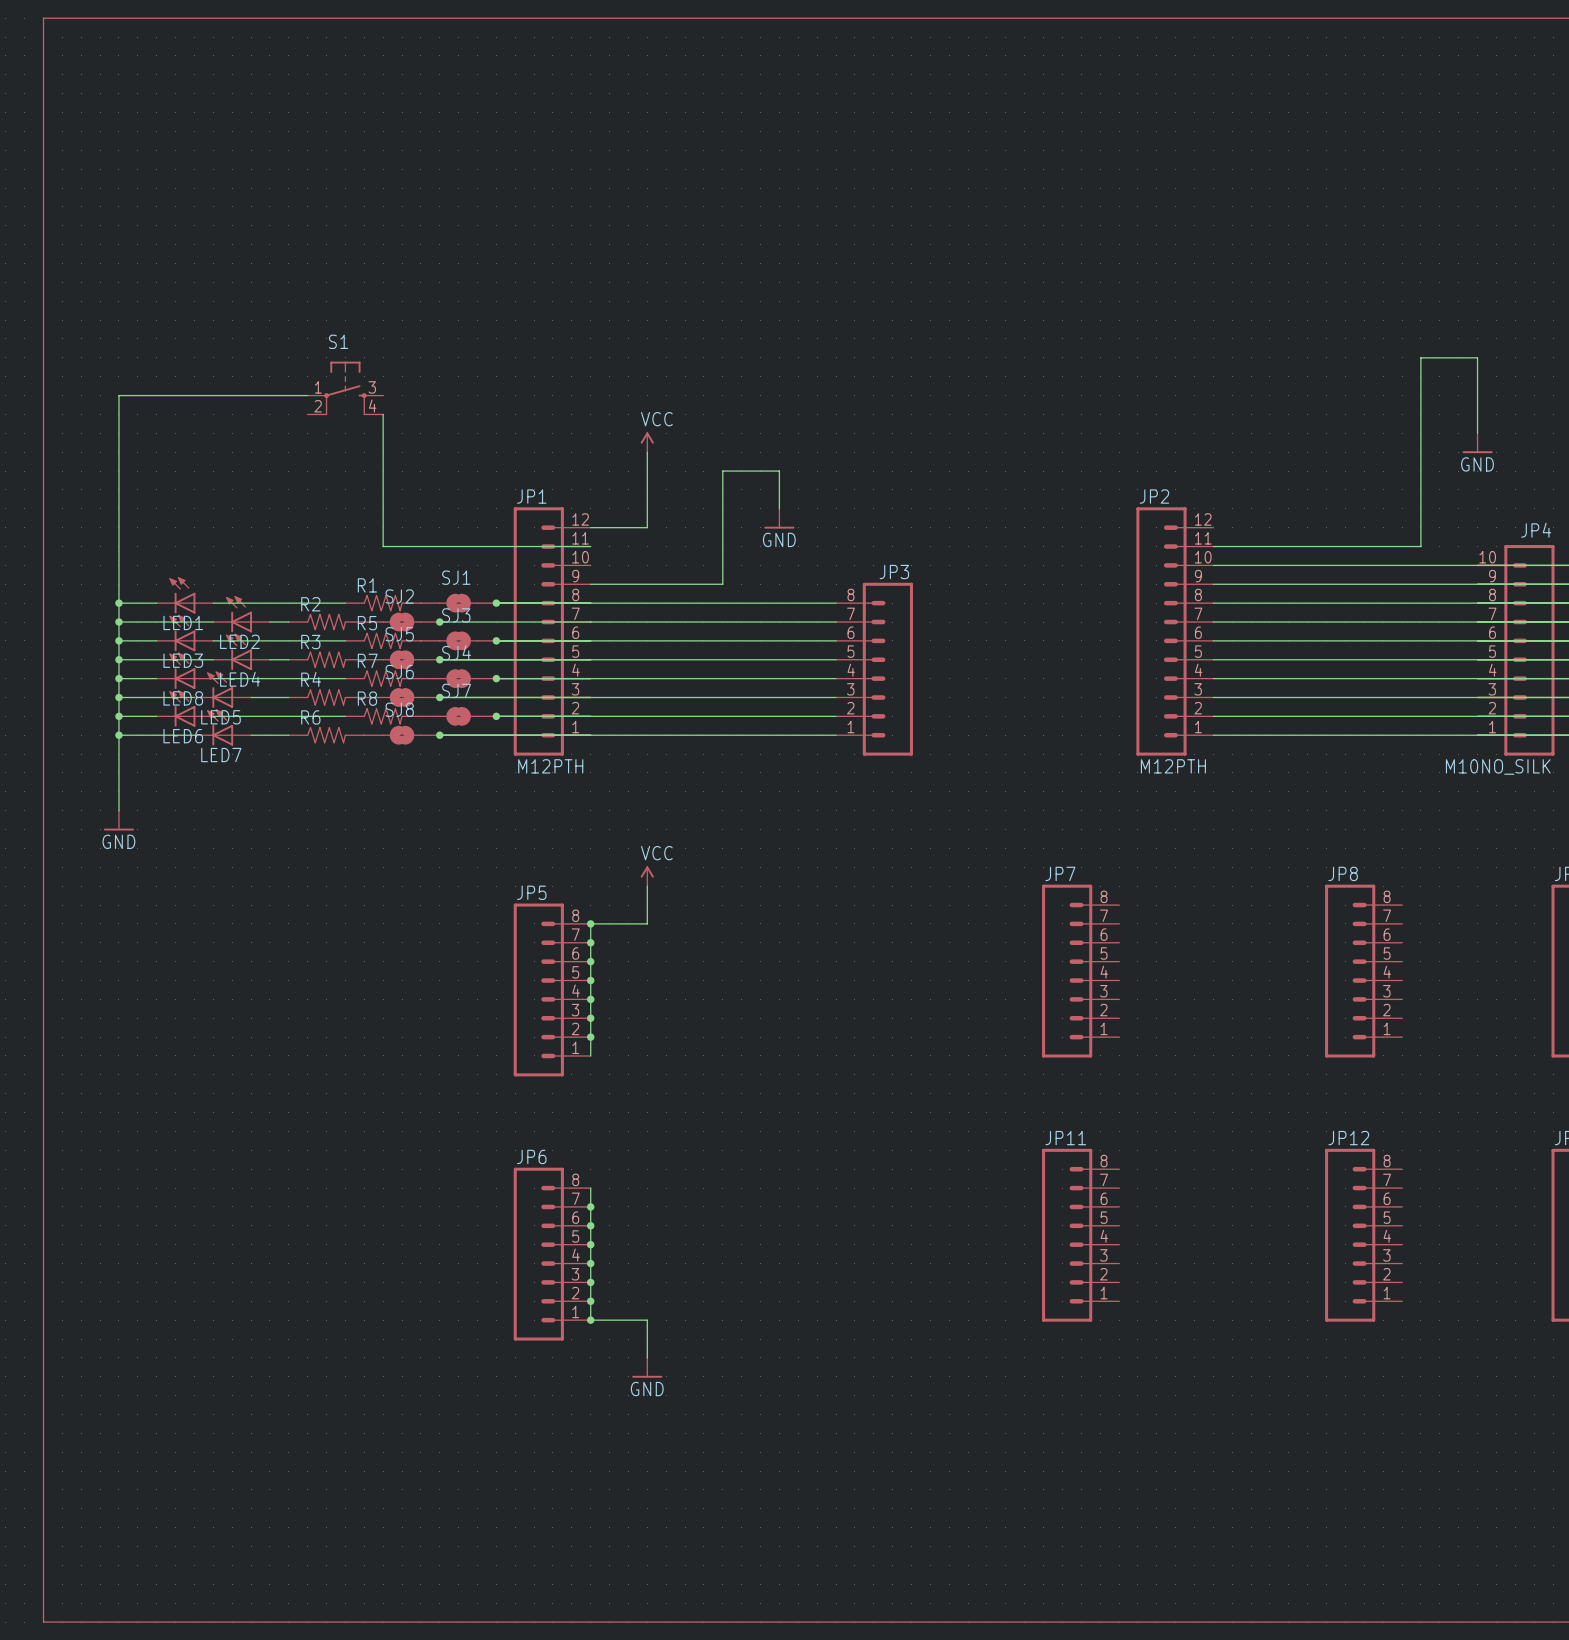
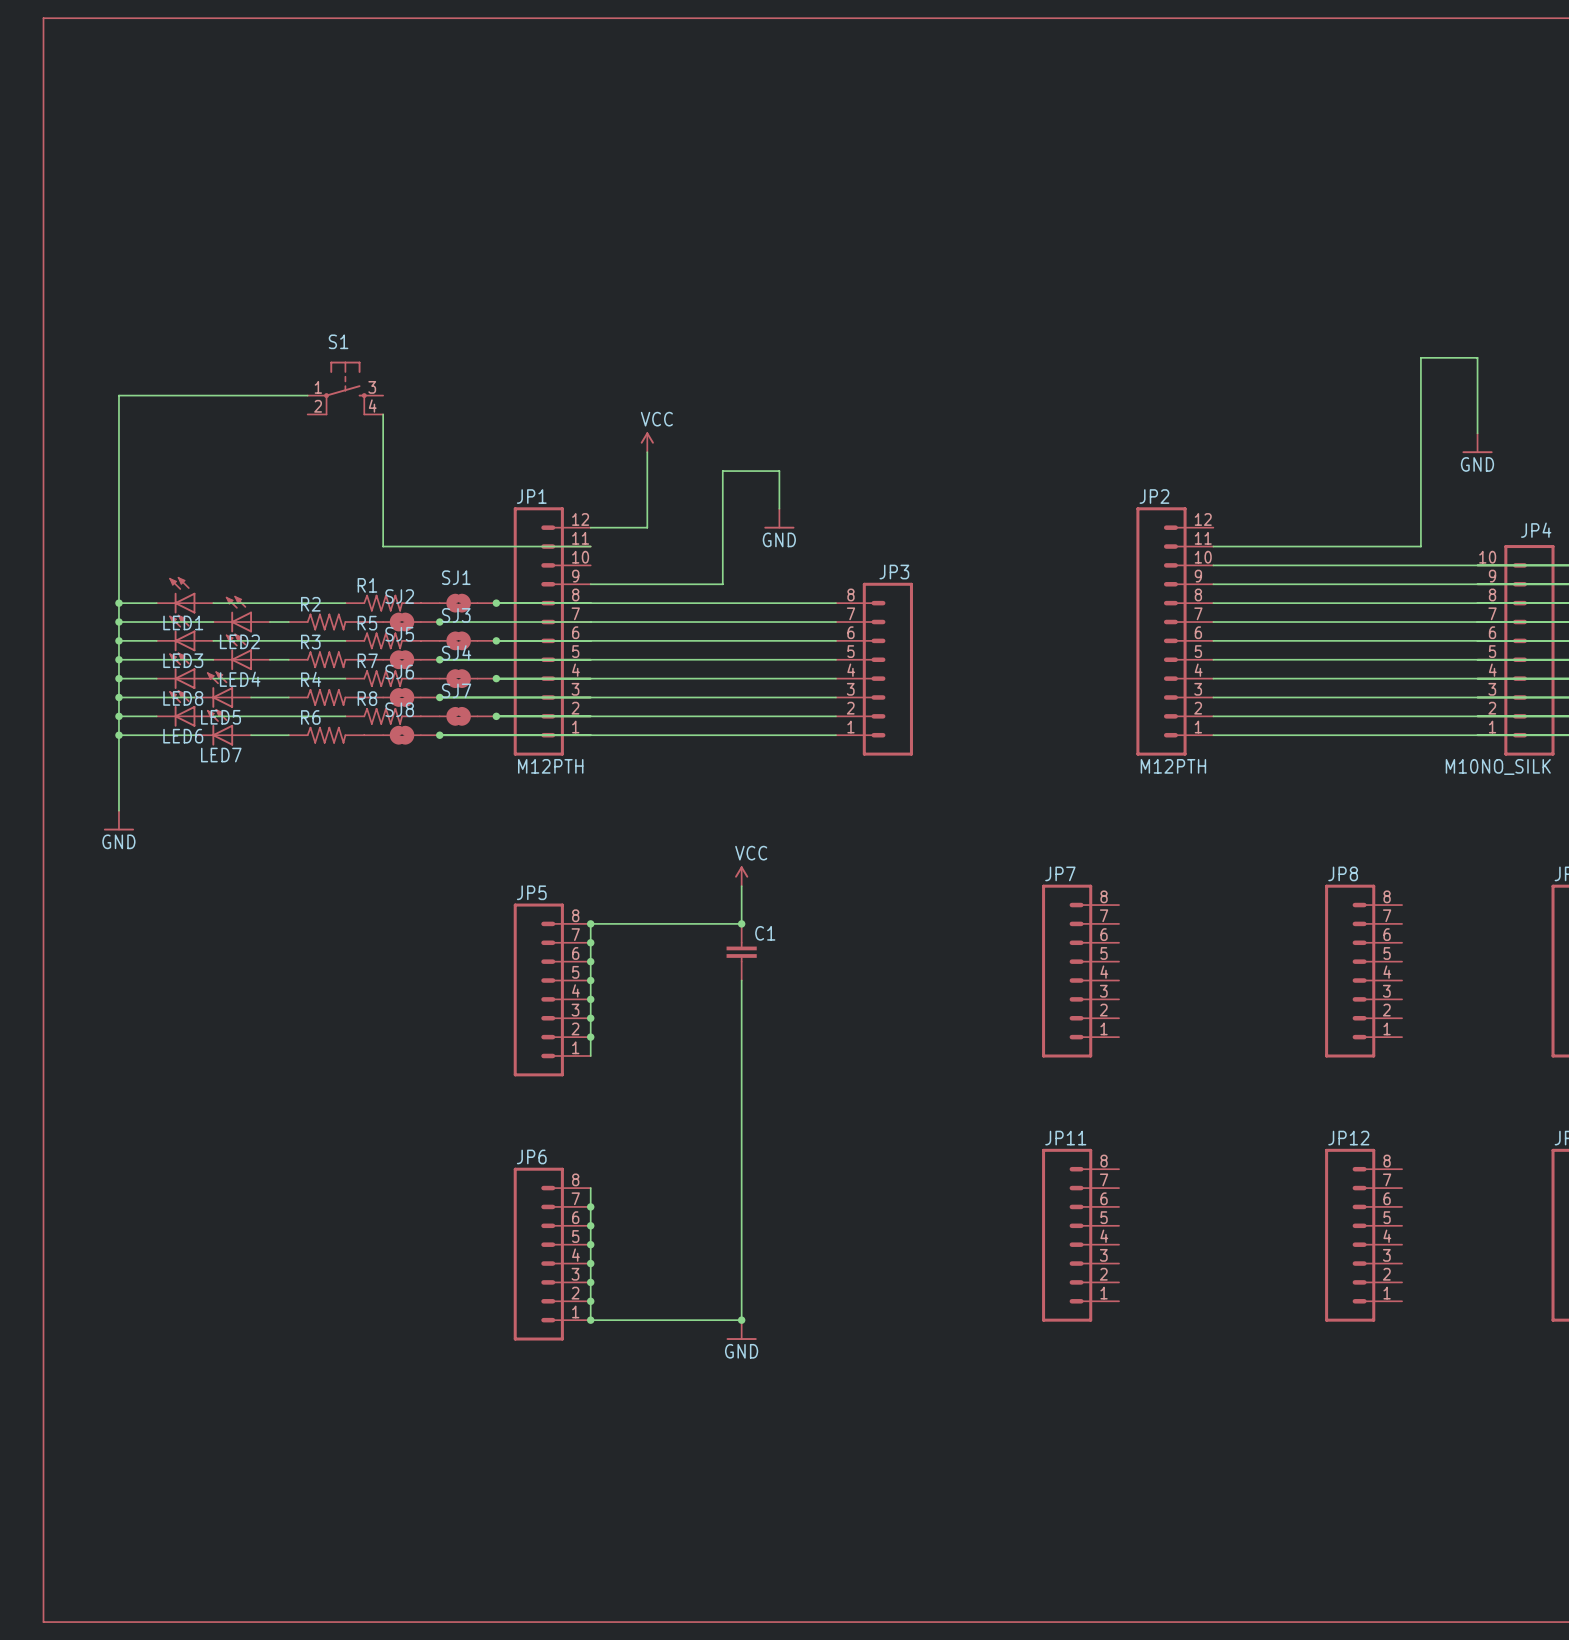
power symbol position: VCC (647, 876) -> VCC (741, 876)
wire: (647, 886) (647, 923) -> (741, 886) (741, 923) (647, 923)
junction: none -> (741, 923)
C1: none -> (741, 952)
wire: (647, 1320) (647, 1357) -> (647, 1320) (741, 1320) (741, 980)
junction: none -> (741, 1320)
power symbol position: GND (647, 1367) -> GND (741, 1330)

